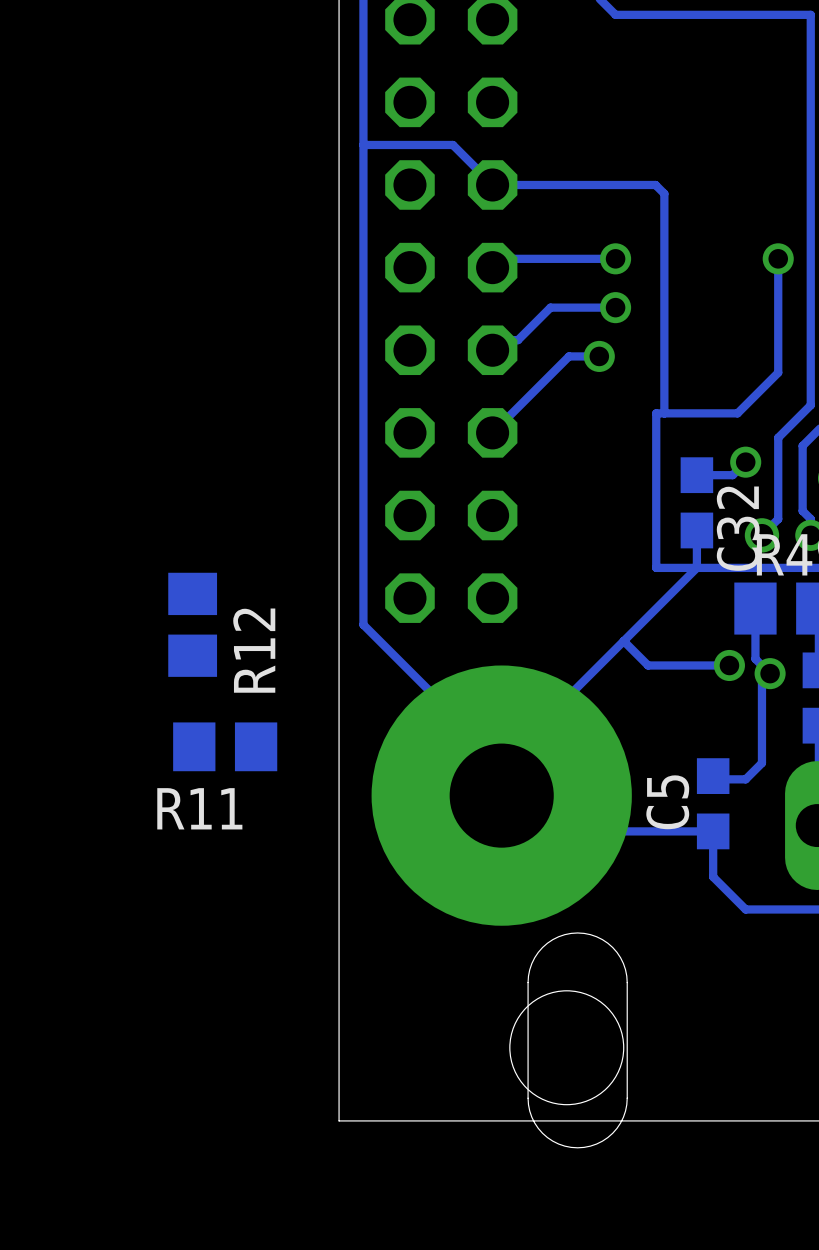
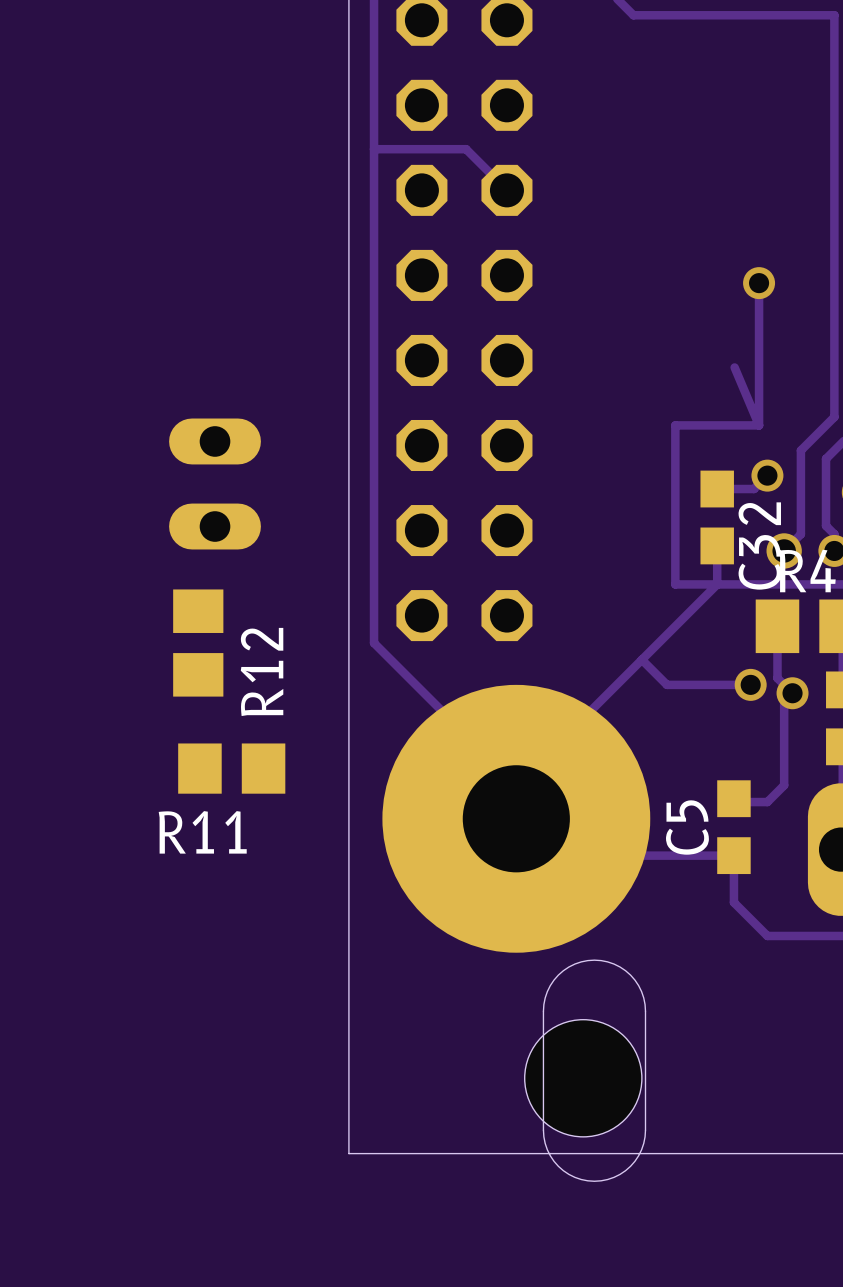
track: (492, 184) (655, 184) (664, 193) (664, 413) -> none
track: (615, 258) (501, 258) (492, 267) -> none
via: (615, 258) -> none
track: (778, 258) (778, 372) (737, 413) -> none
via position: (778, 258) -> (759, 283)
track: none -> (759, 283) (759, 425) (734, 367)
track: (615, 307) (550, 307) (517, 340) (502, 340) (492, 350) -> none
via: (615, 307) -> none
track: (599, 356) (569, 356) (492, 432) -> none
via: (599, 356) -> none
part: none -> (215, 483)

